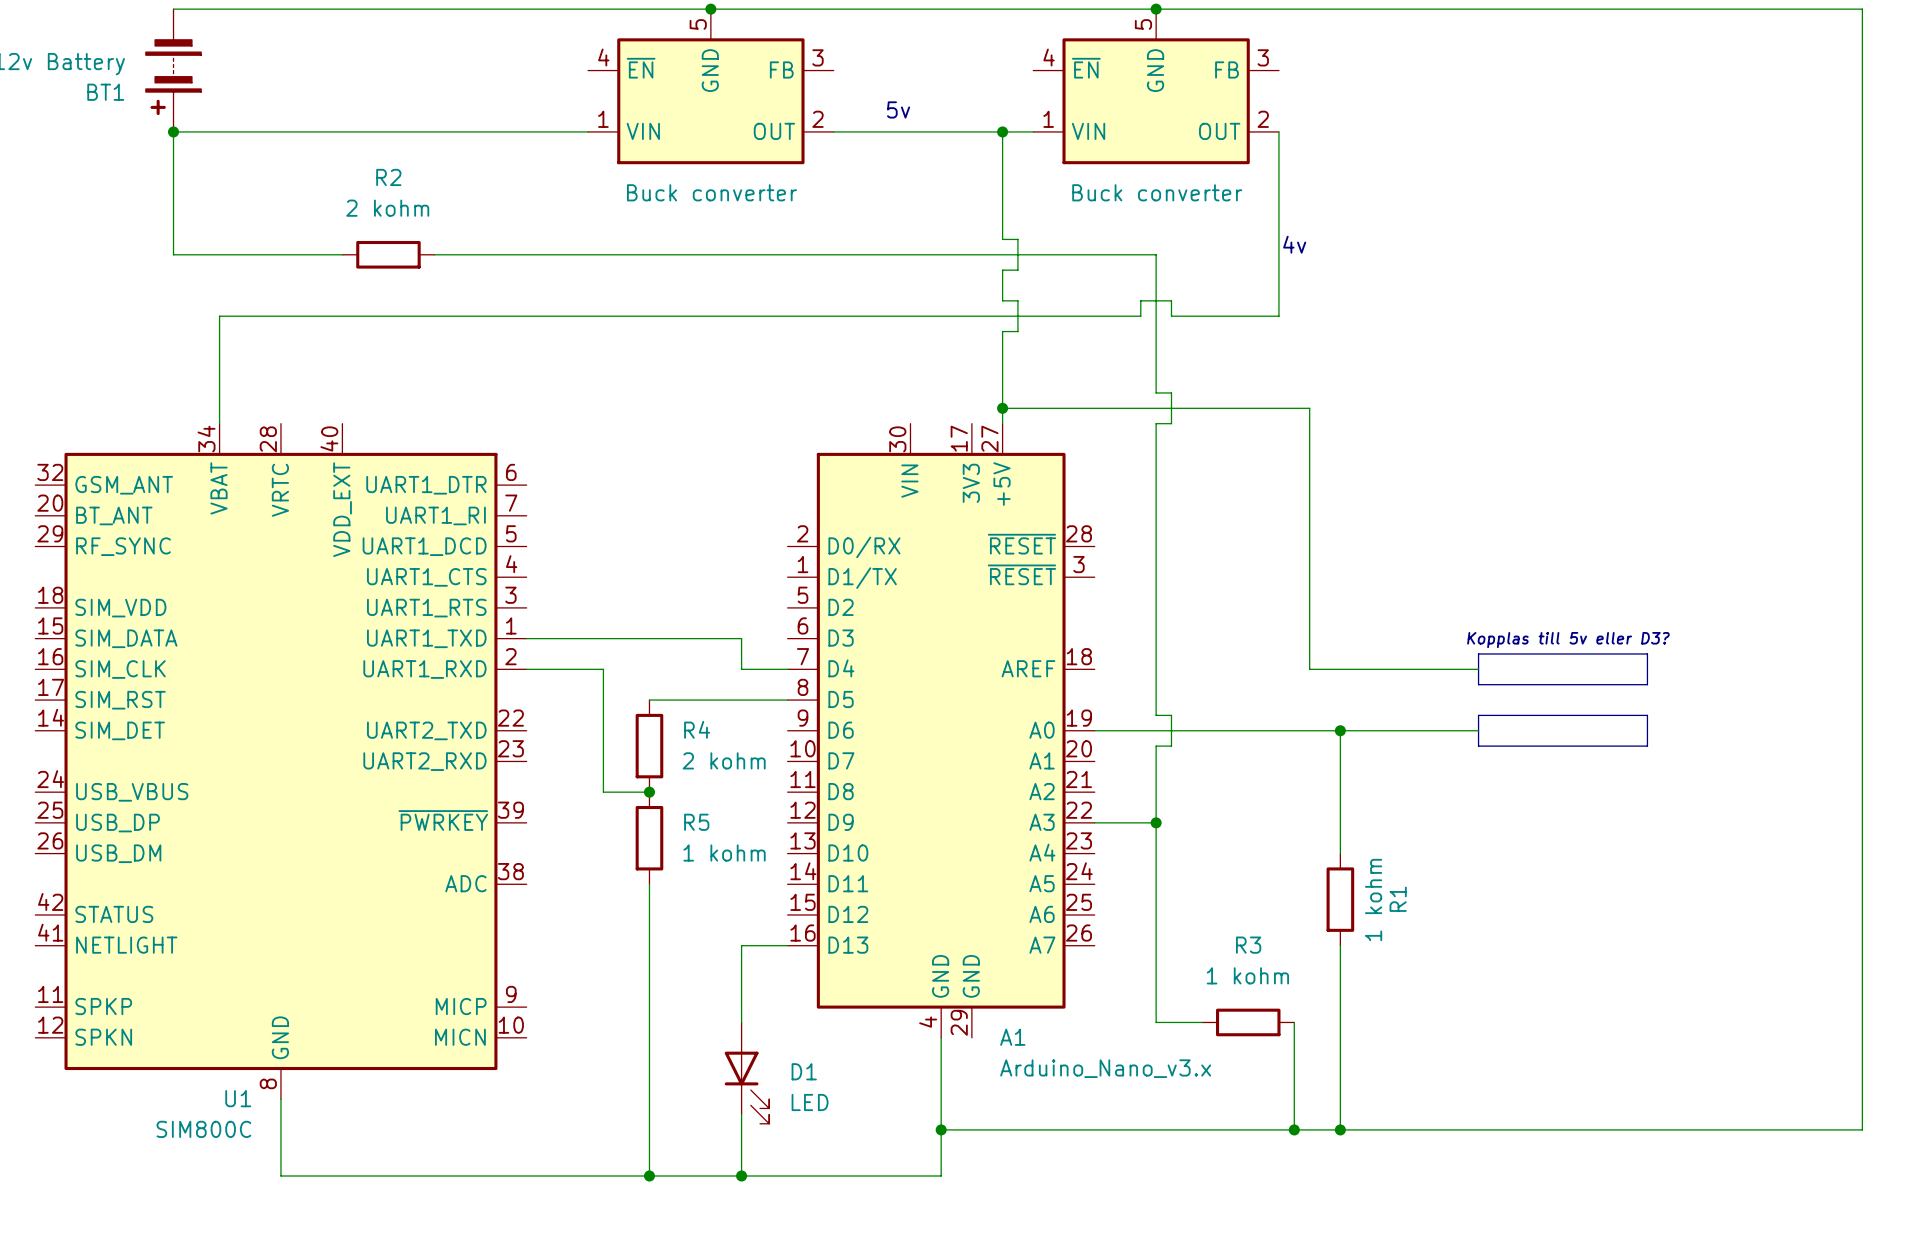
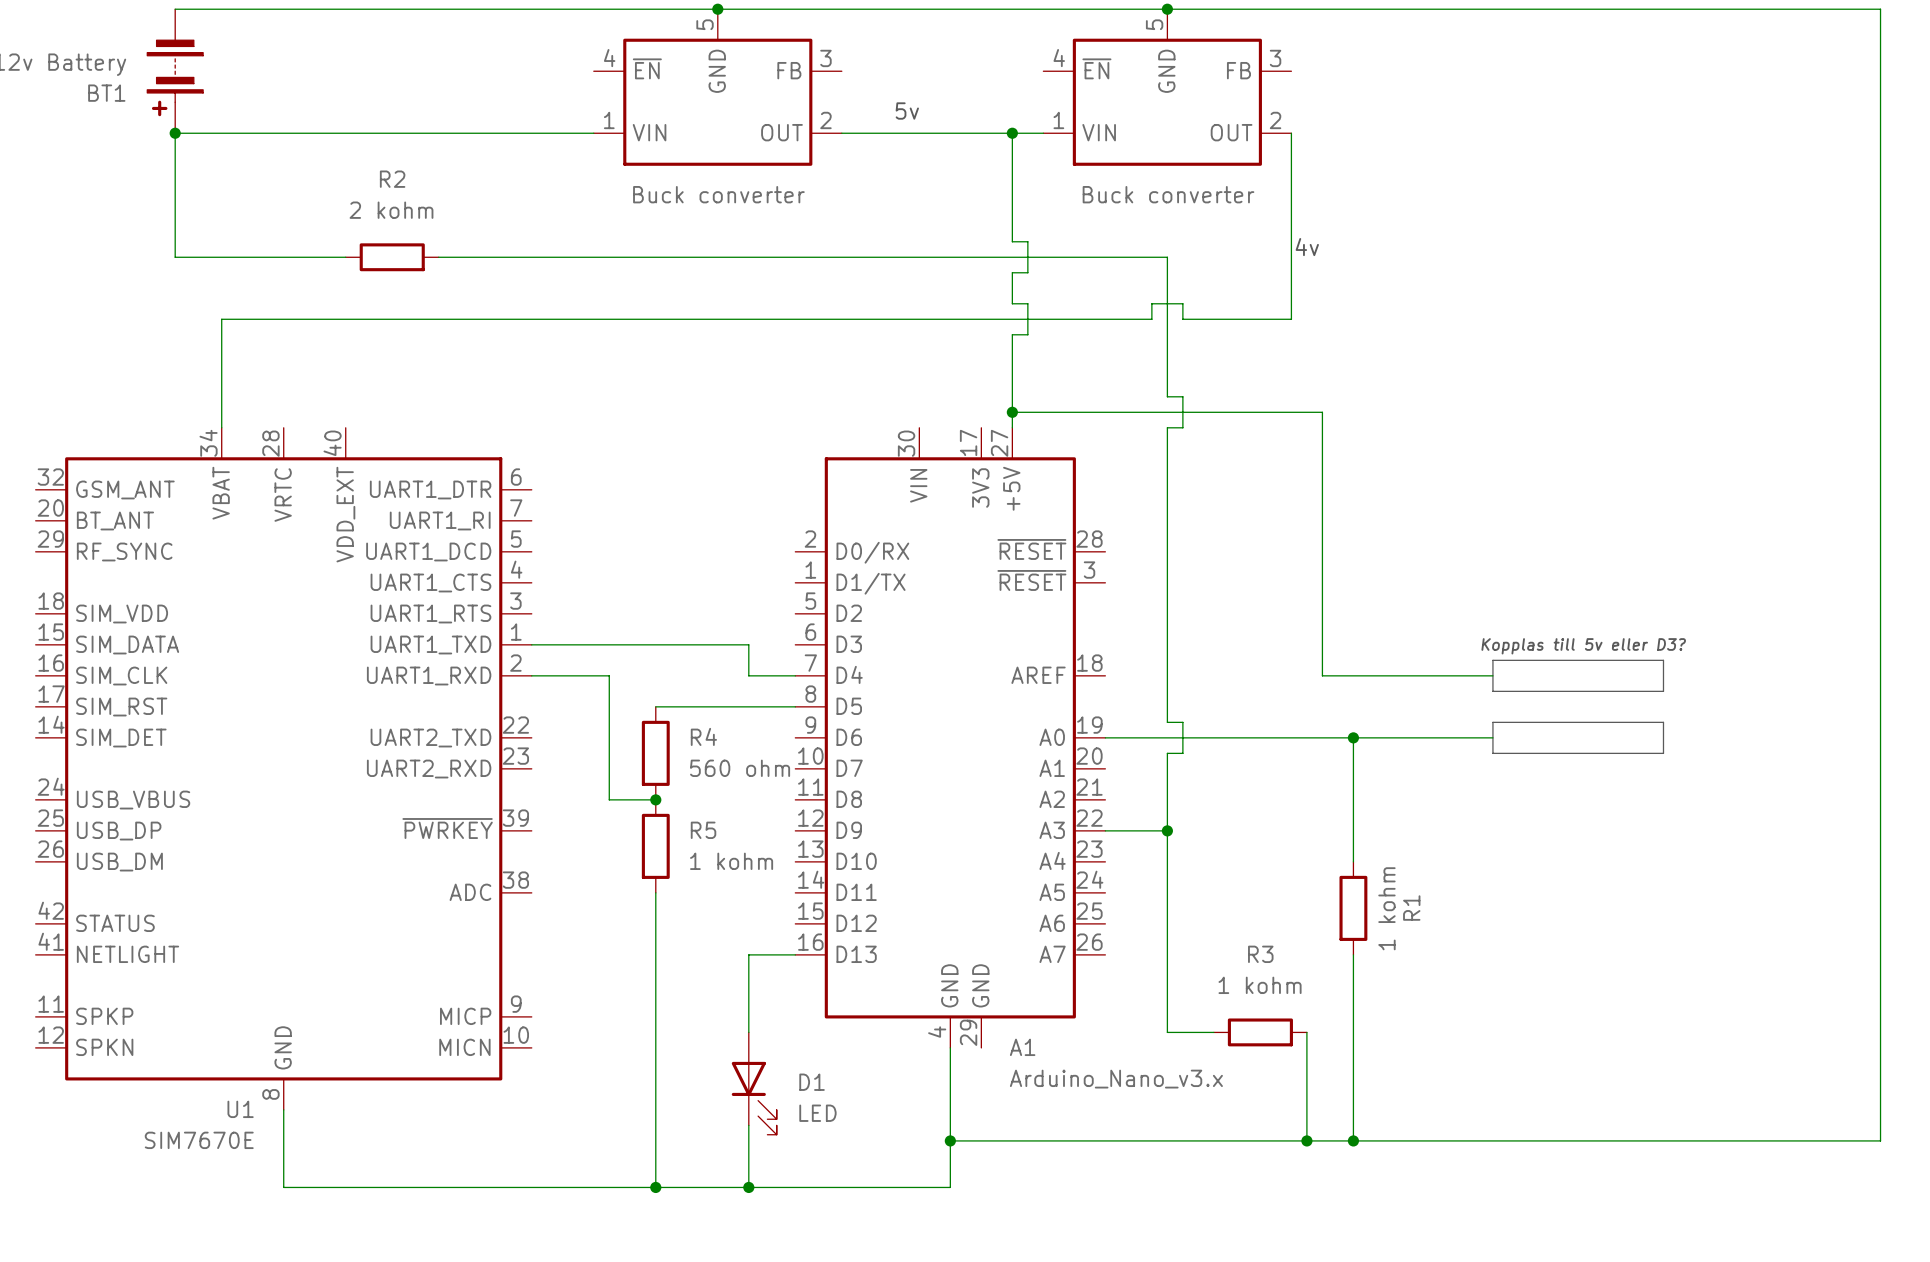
R4 value: 2 kohm (724, 760) -> 560 ohm (740, 768)
U1 value: SIM800C (203, 1129) -> SIM7670E (199, 1140)

